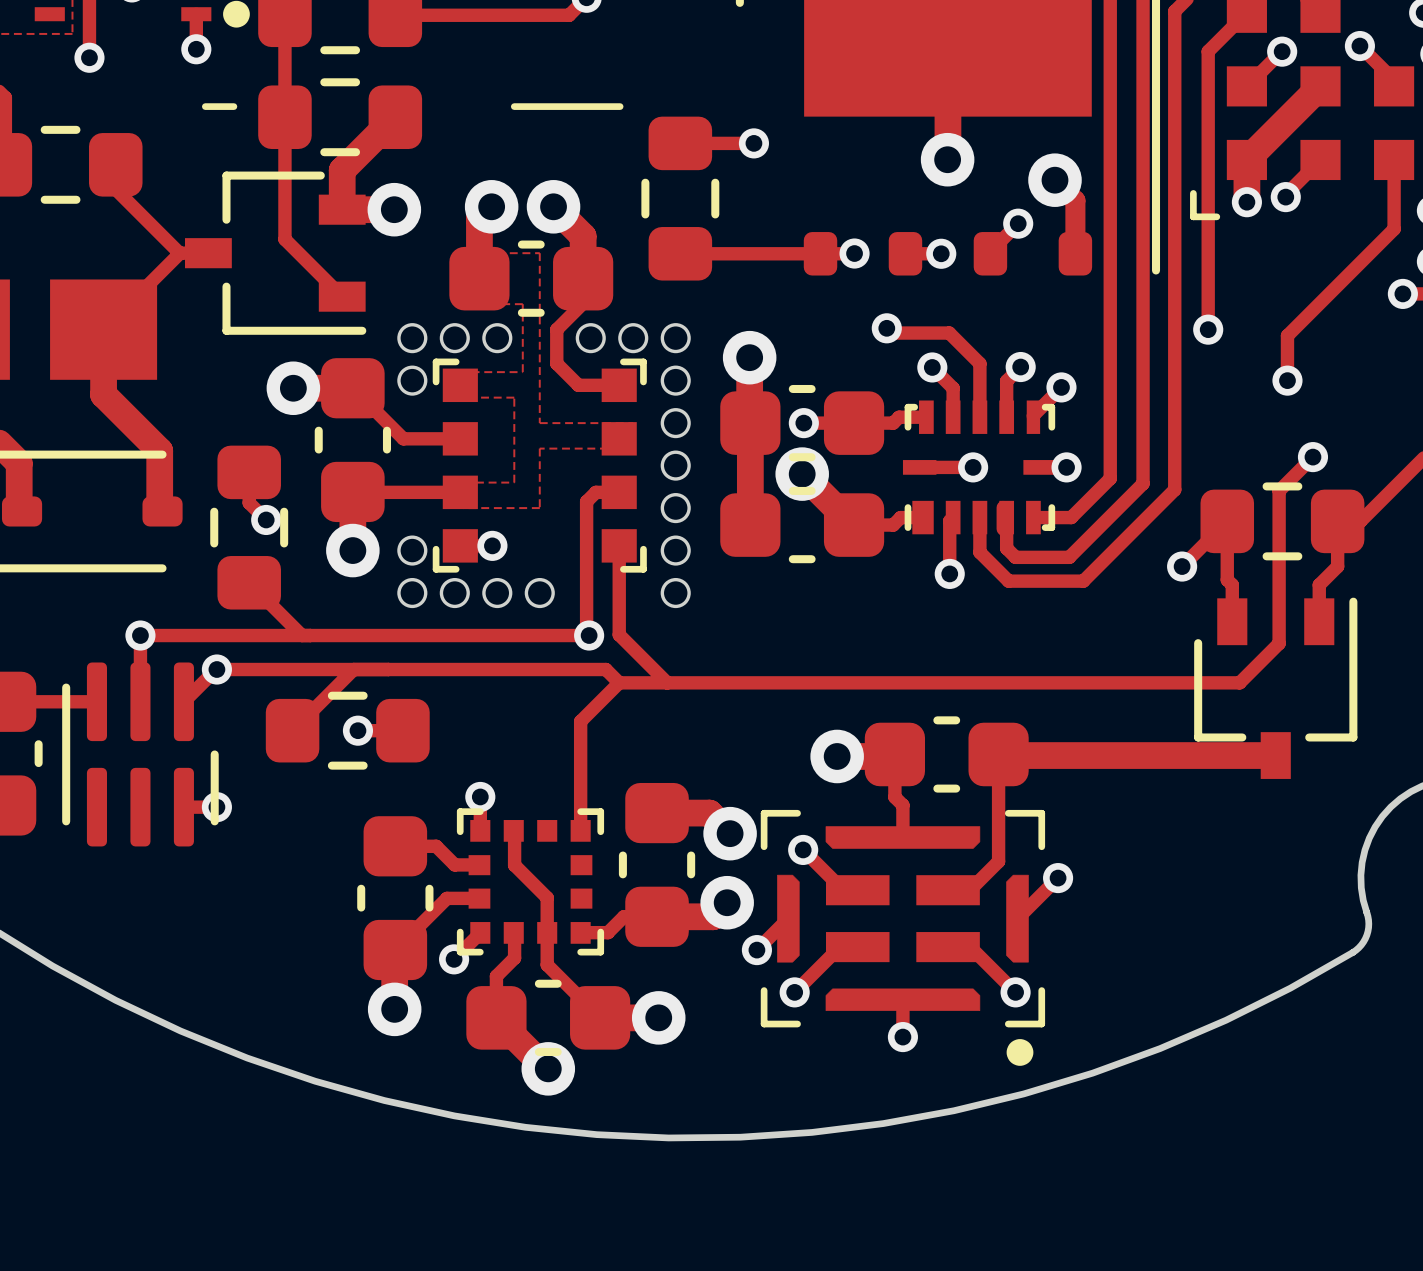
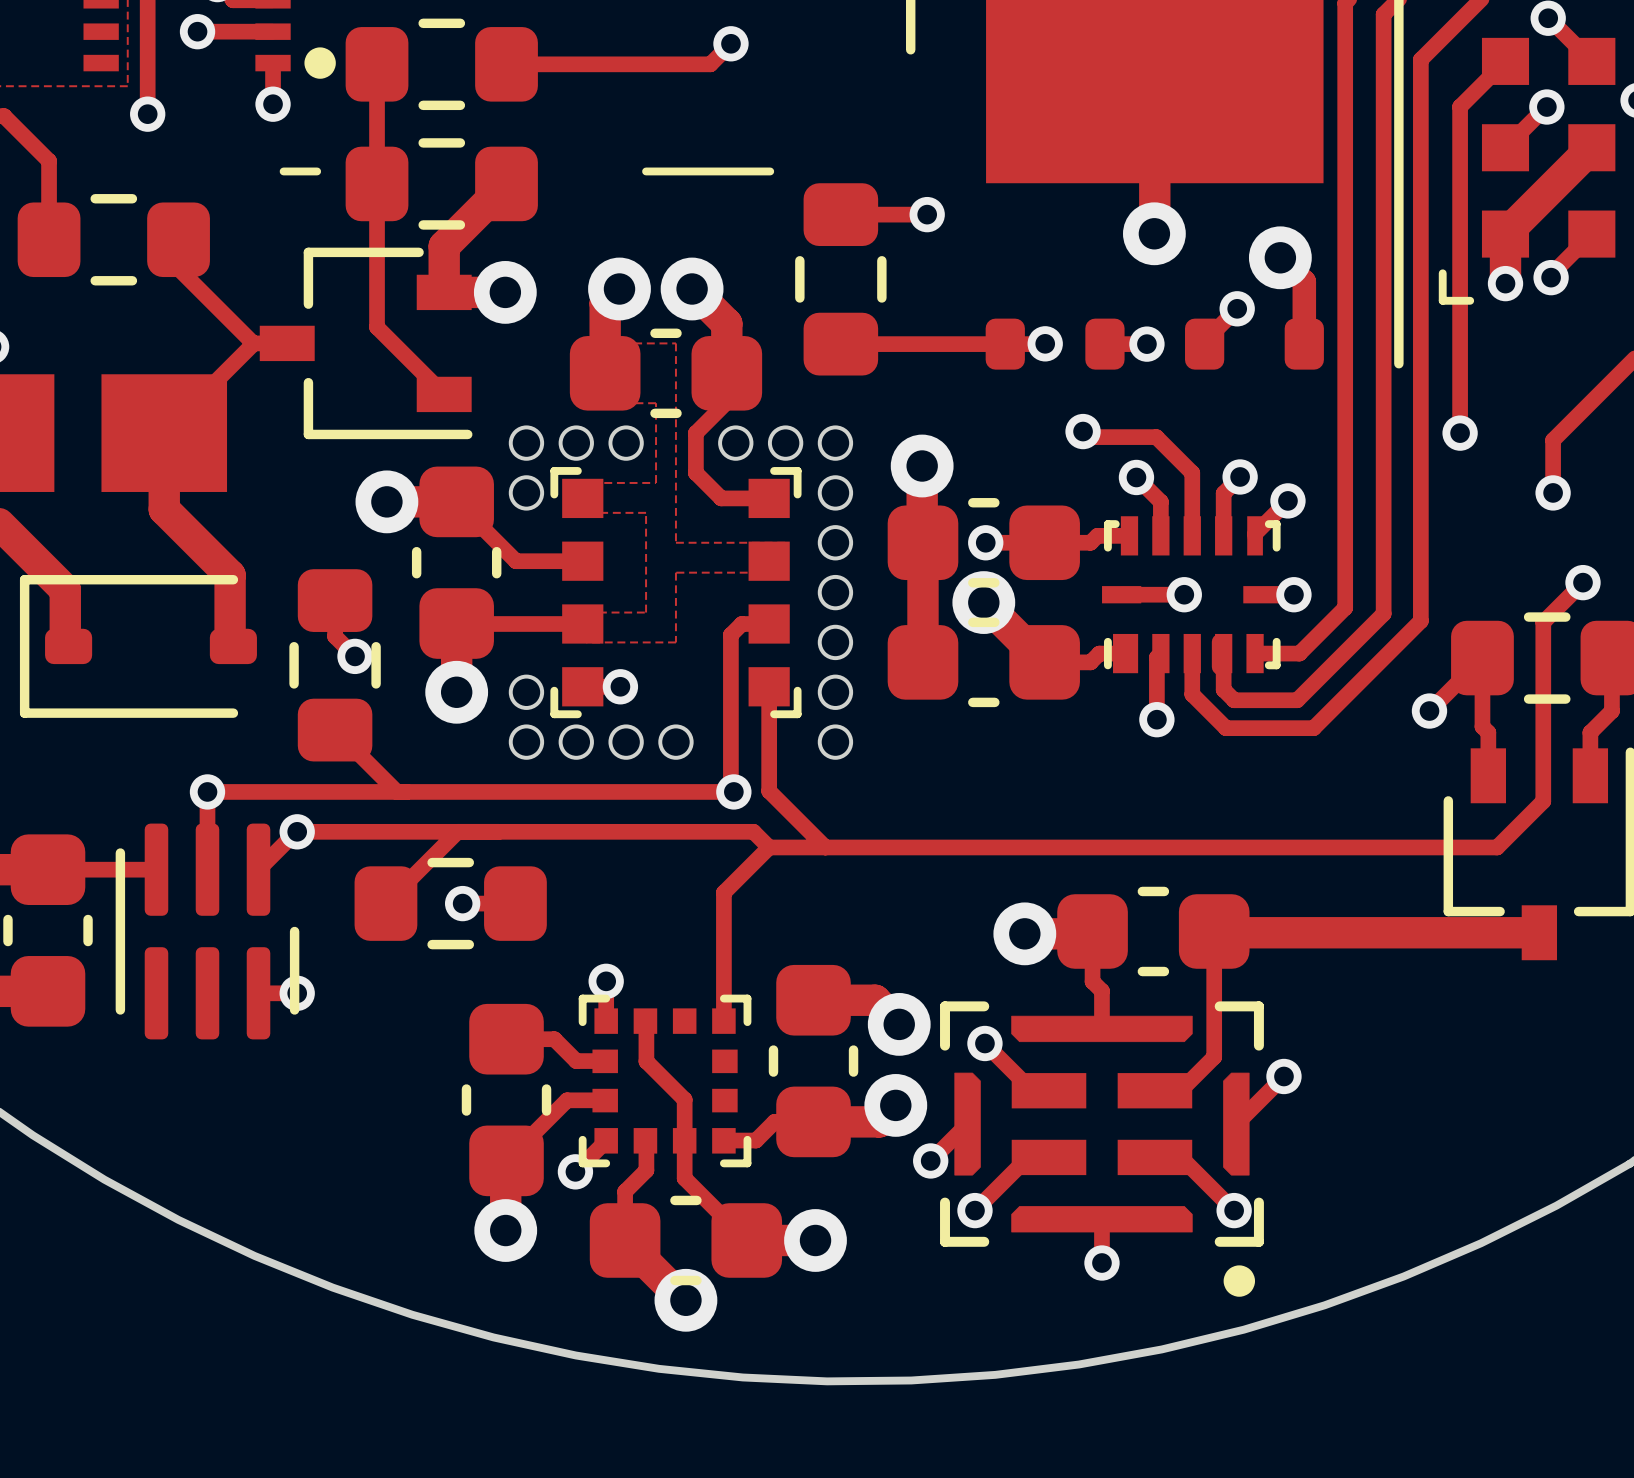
part footprint: [760, 809, 1046, 1066] -> [940, 1001, 1264, 1297]

